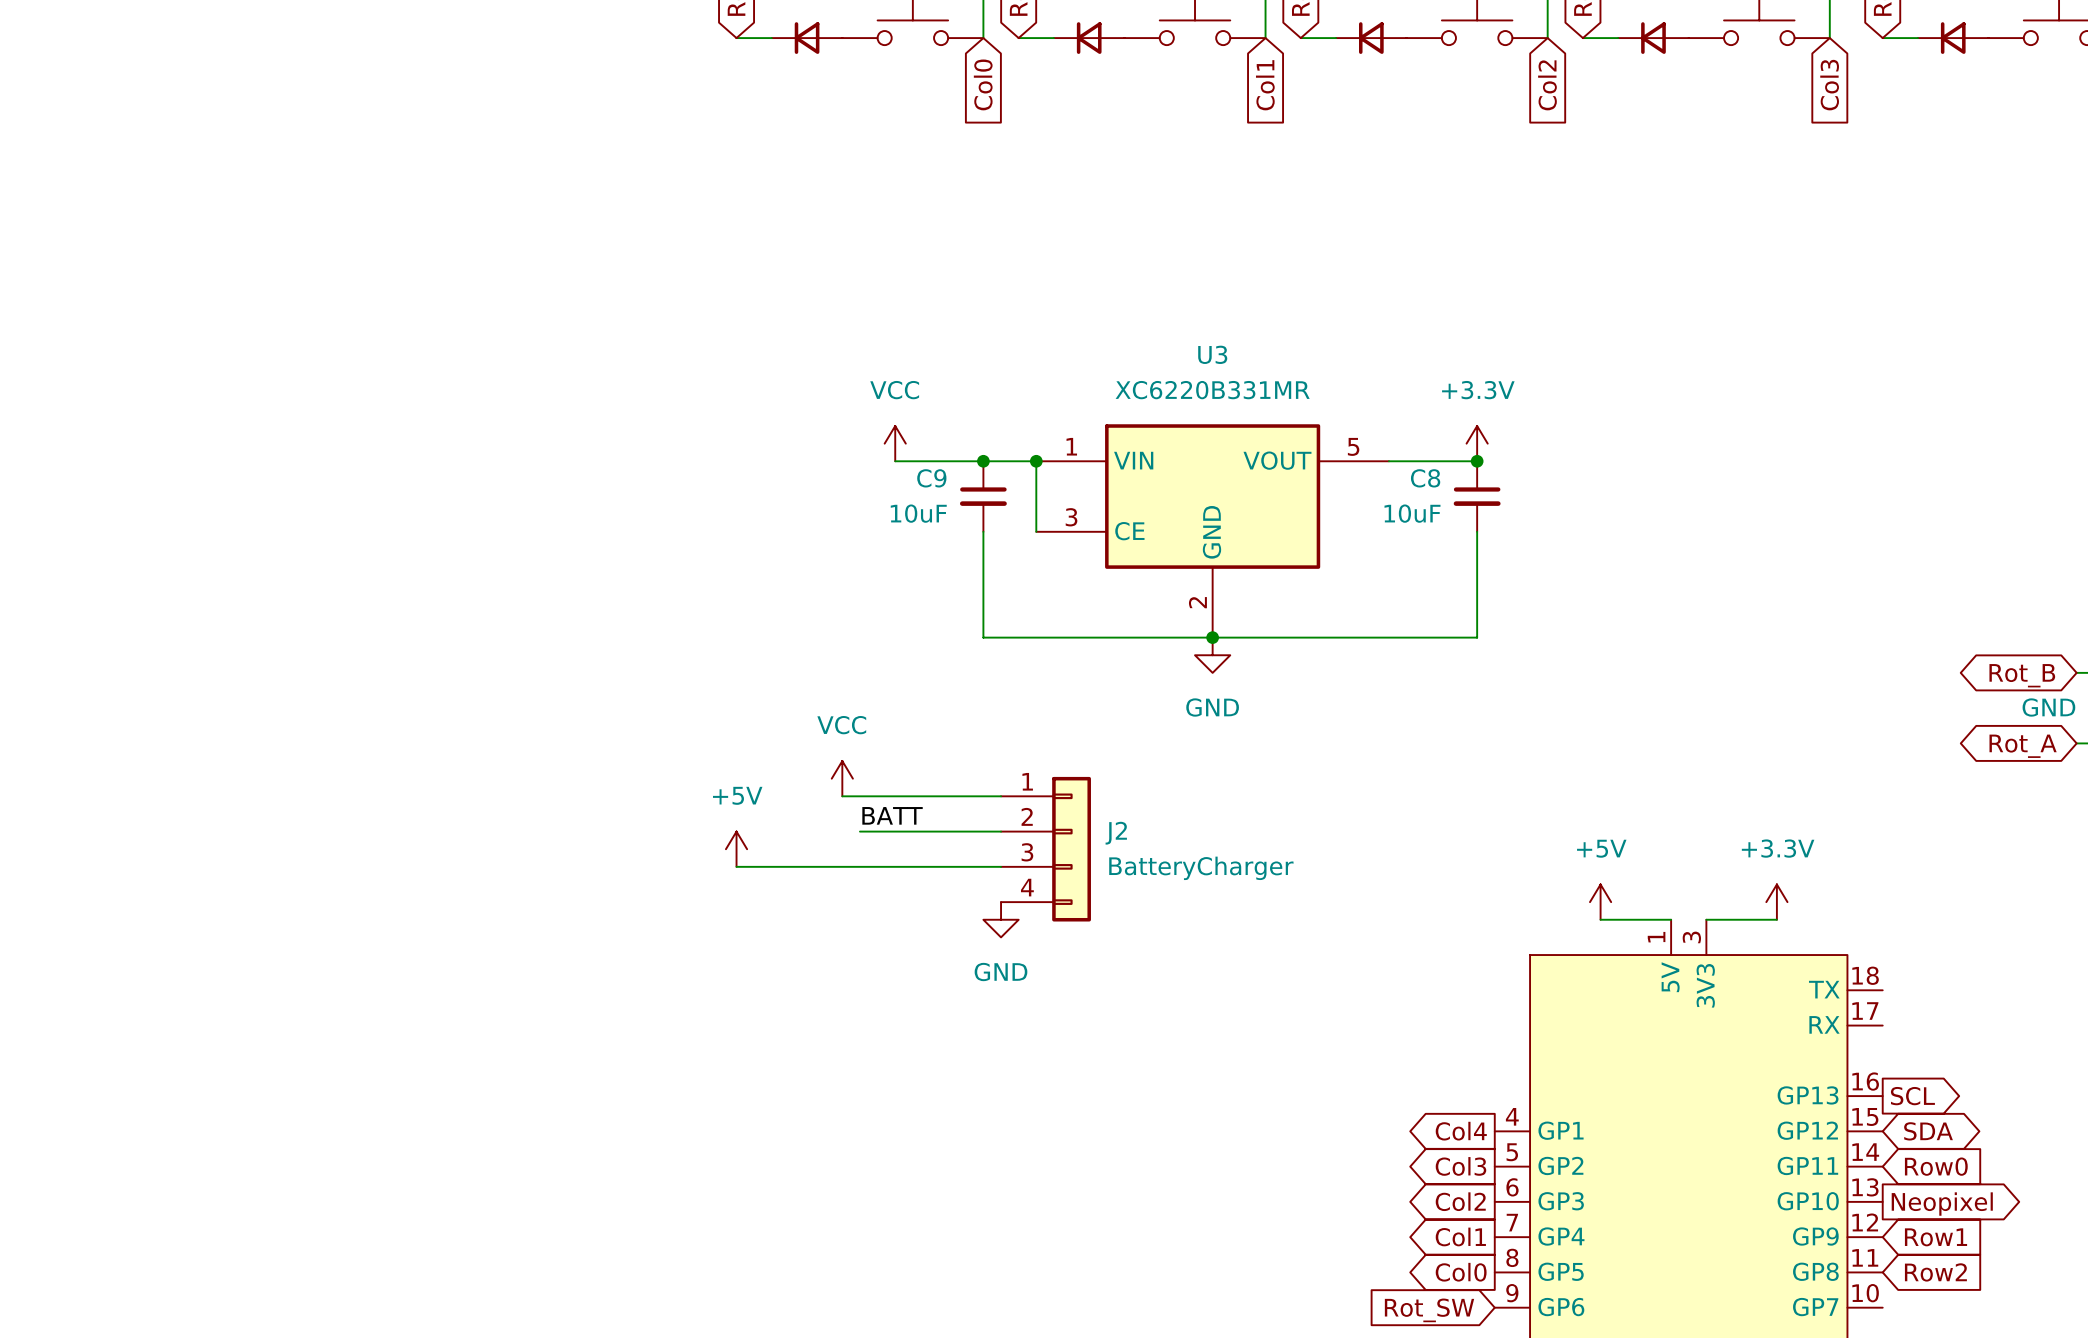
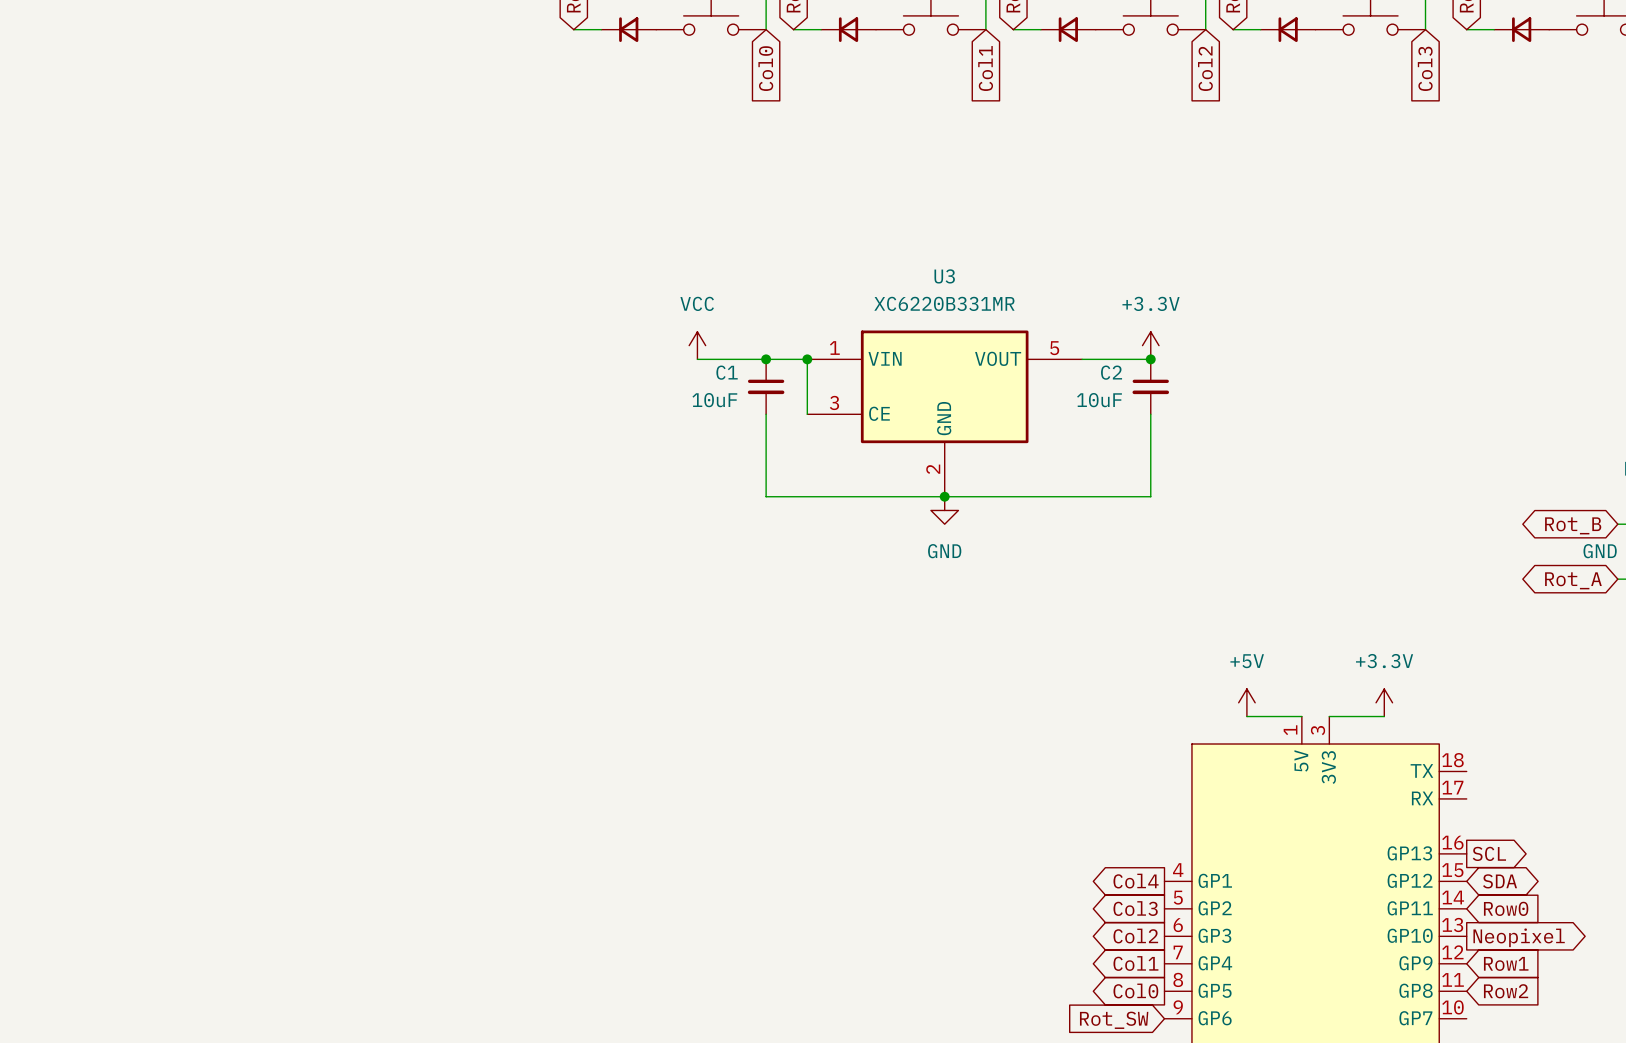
C9 name: C9 (931, 478) -> C1 (727, 372)
C8 name: C8 (1425, 478) -> C2 (1111, 372)
power symbol: VCC (842, 778) -> none
wire: (842, 796) (1001, 796) -> none
label: BATT (892, 815) -> none
wire: (859, 831) (1001, 831) -> none
power symbol: +5V (736, 849) -> none
J2: BatteryCharger (1046, 849) -> none
wire: (736, 866) (1001, 866) -> none
power symbol: GND (1001, 919) -> none

